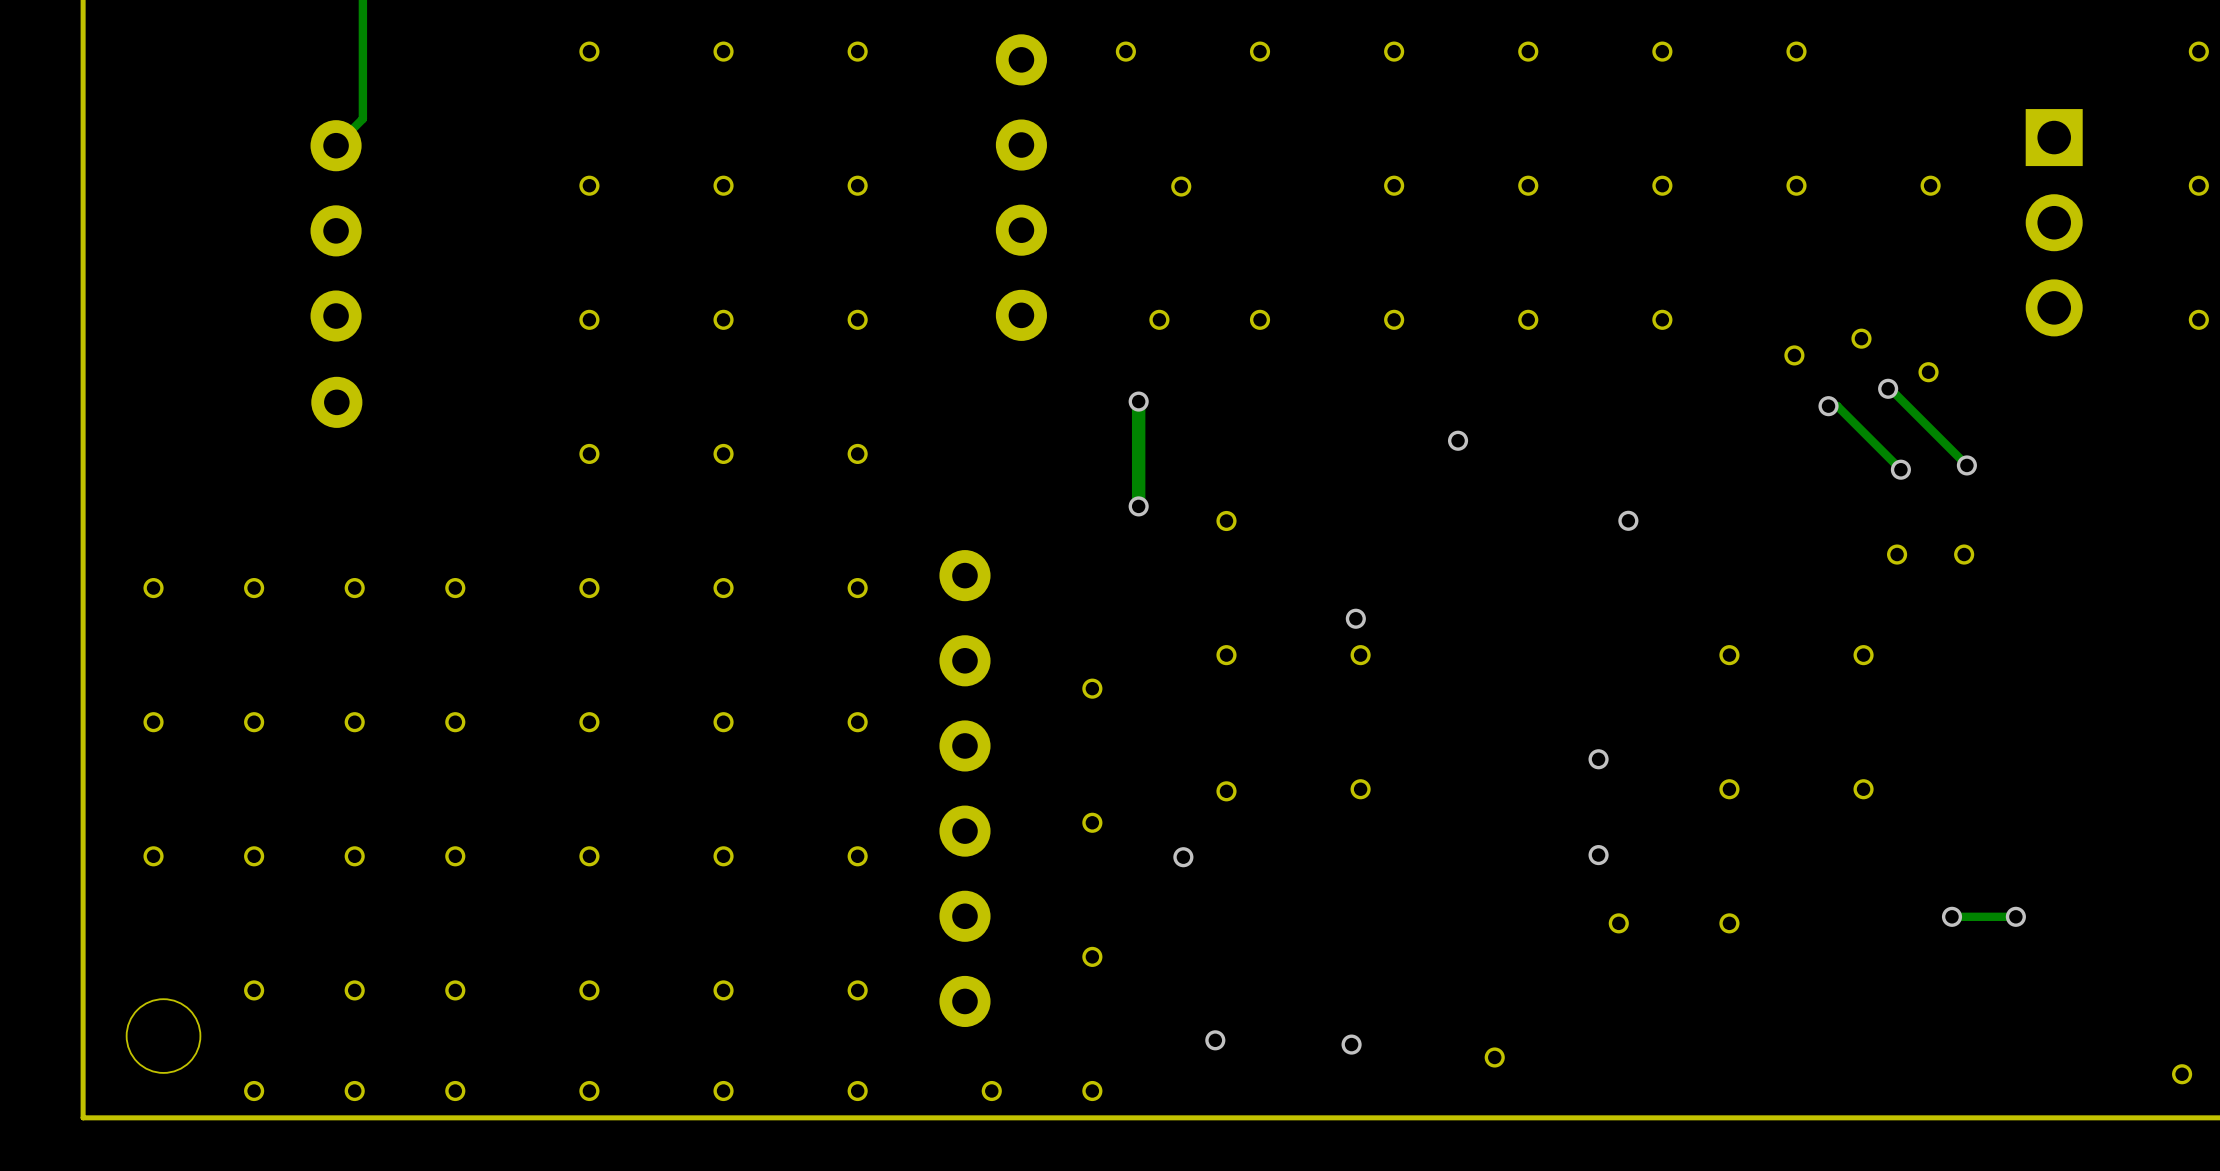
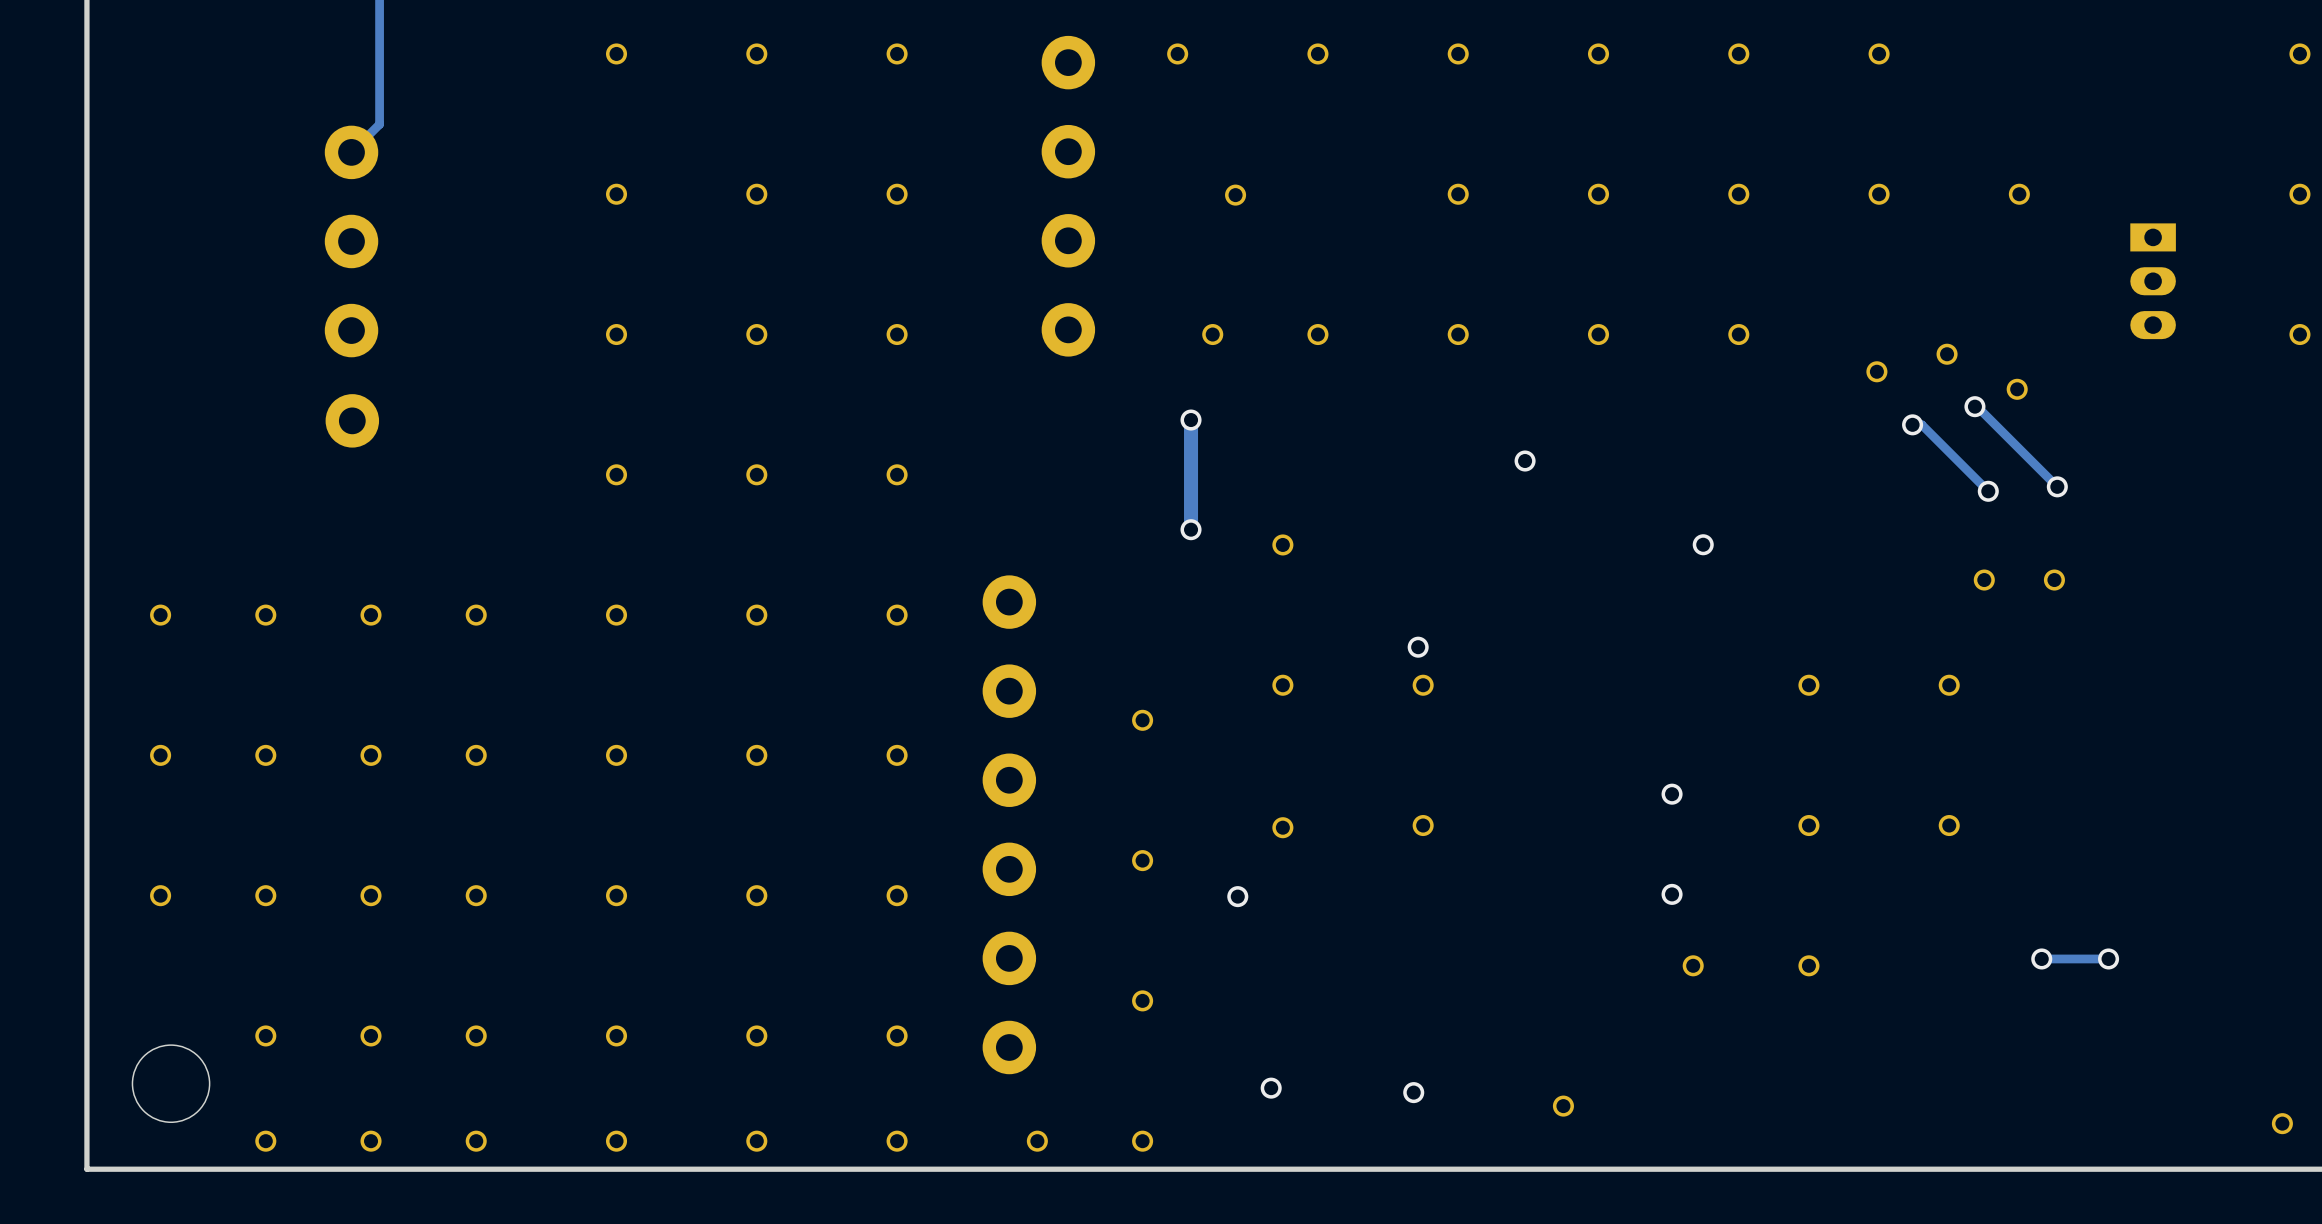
part: (2054, 222) -> none
part: none -> (2153, 281)

